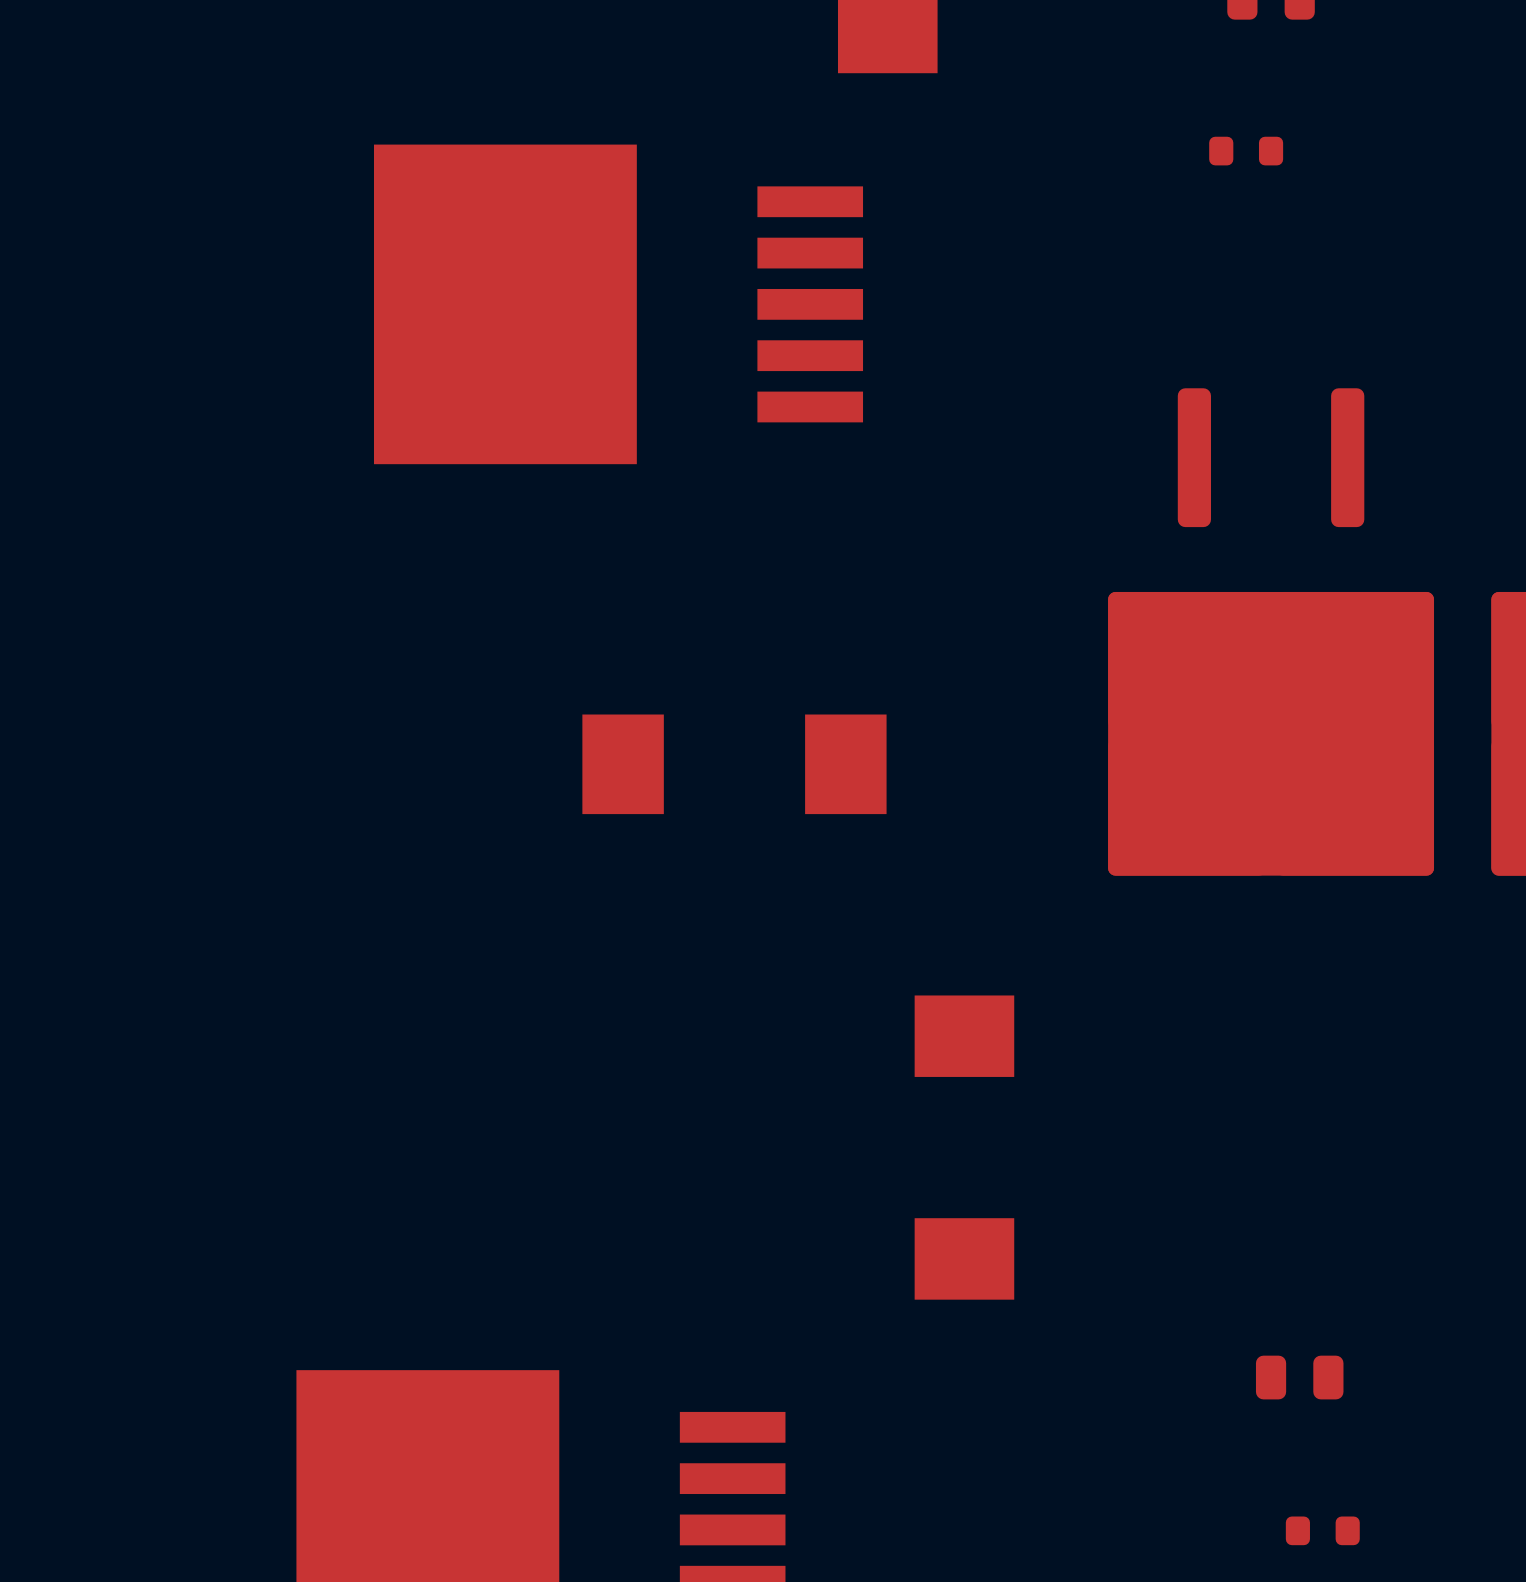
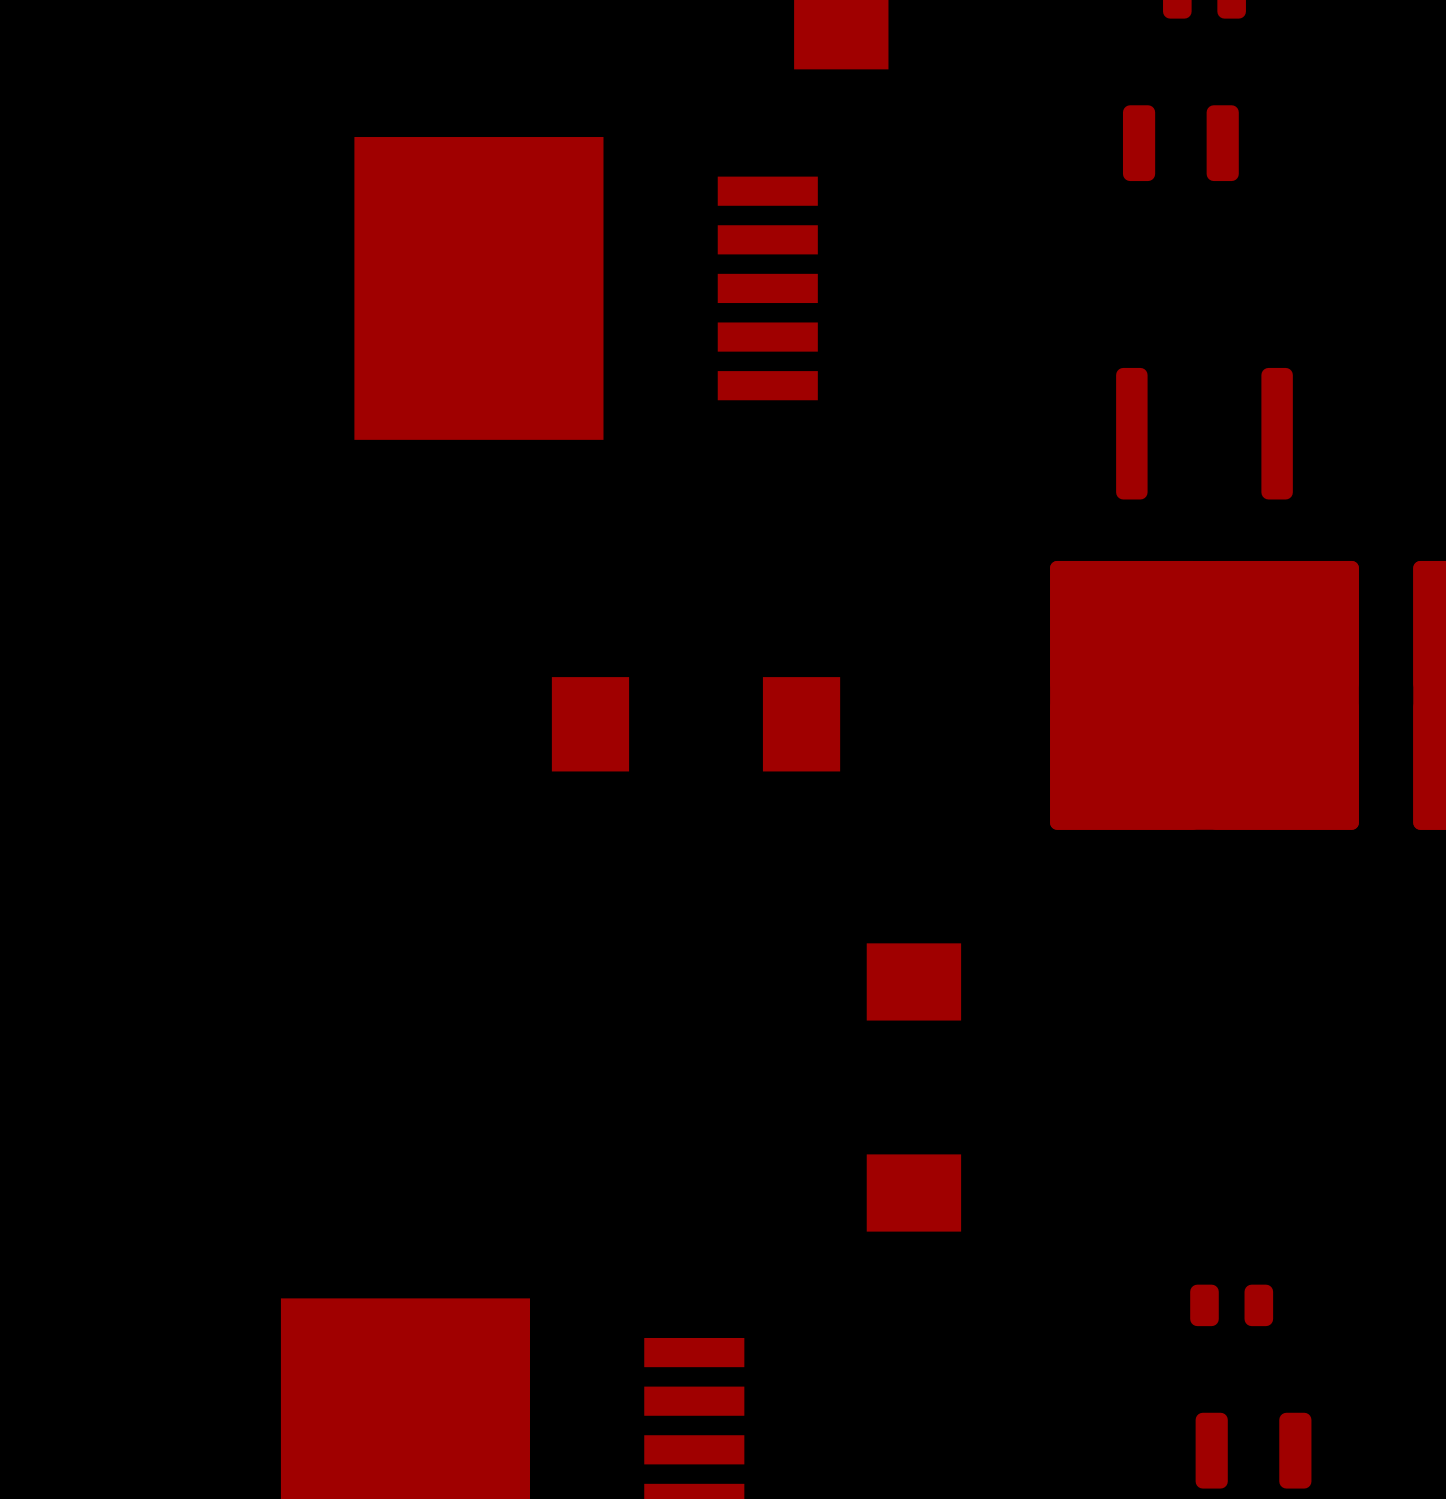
part footprint: [1209, 136, 1284, 166] -> [1122, 105, 1239, 182]
part footprint: [1285, 1516, 1360, 1546] -> [1195, 1412, 1312, 1489]

